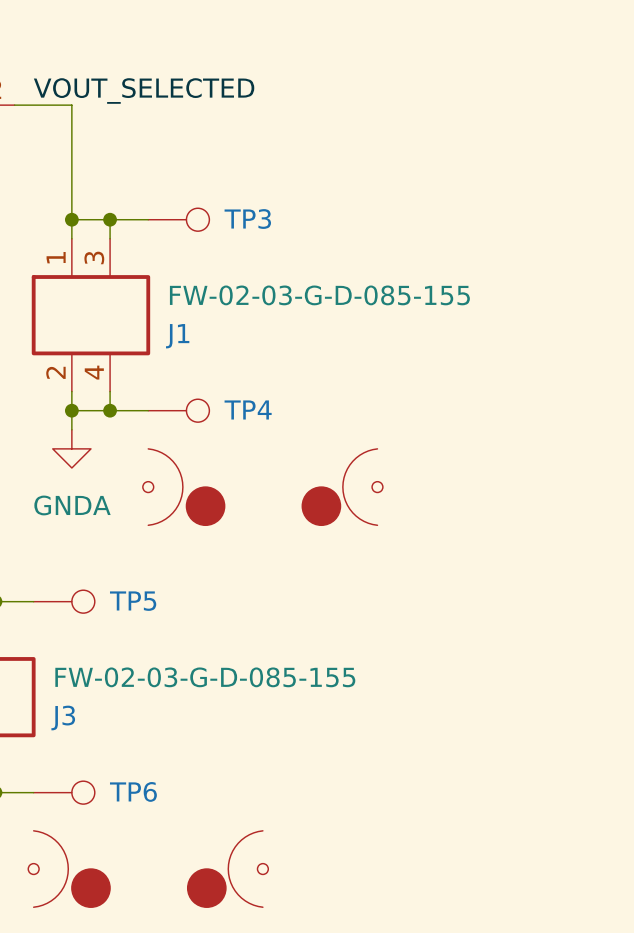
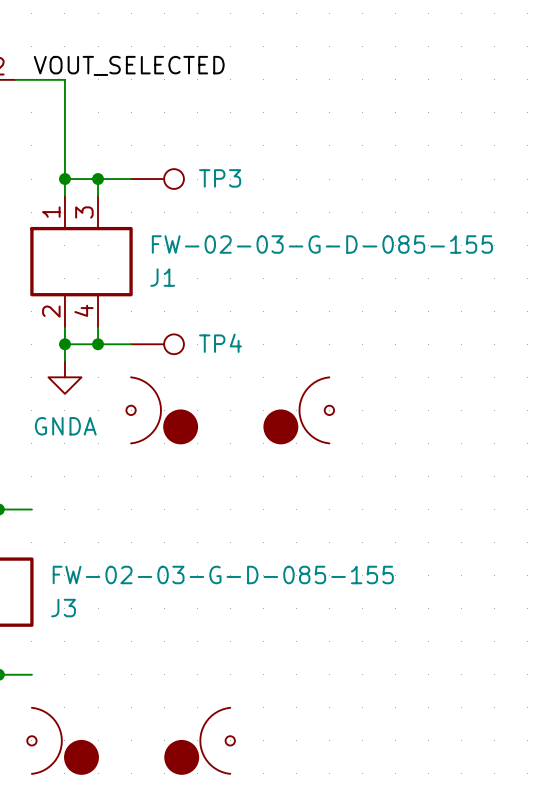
TP5: (64, 601) -> none
TP6: (64, 792) -> none

